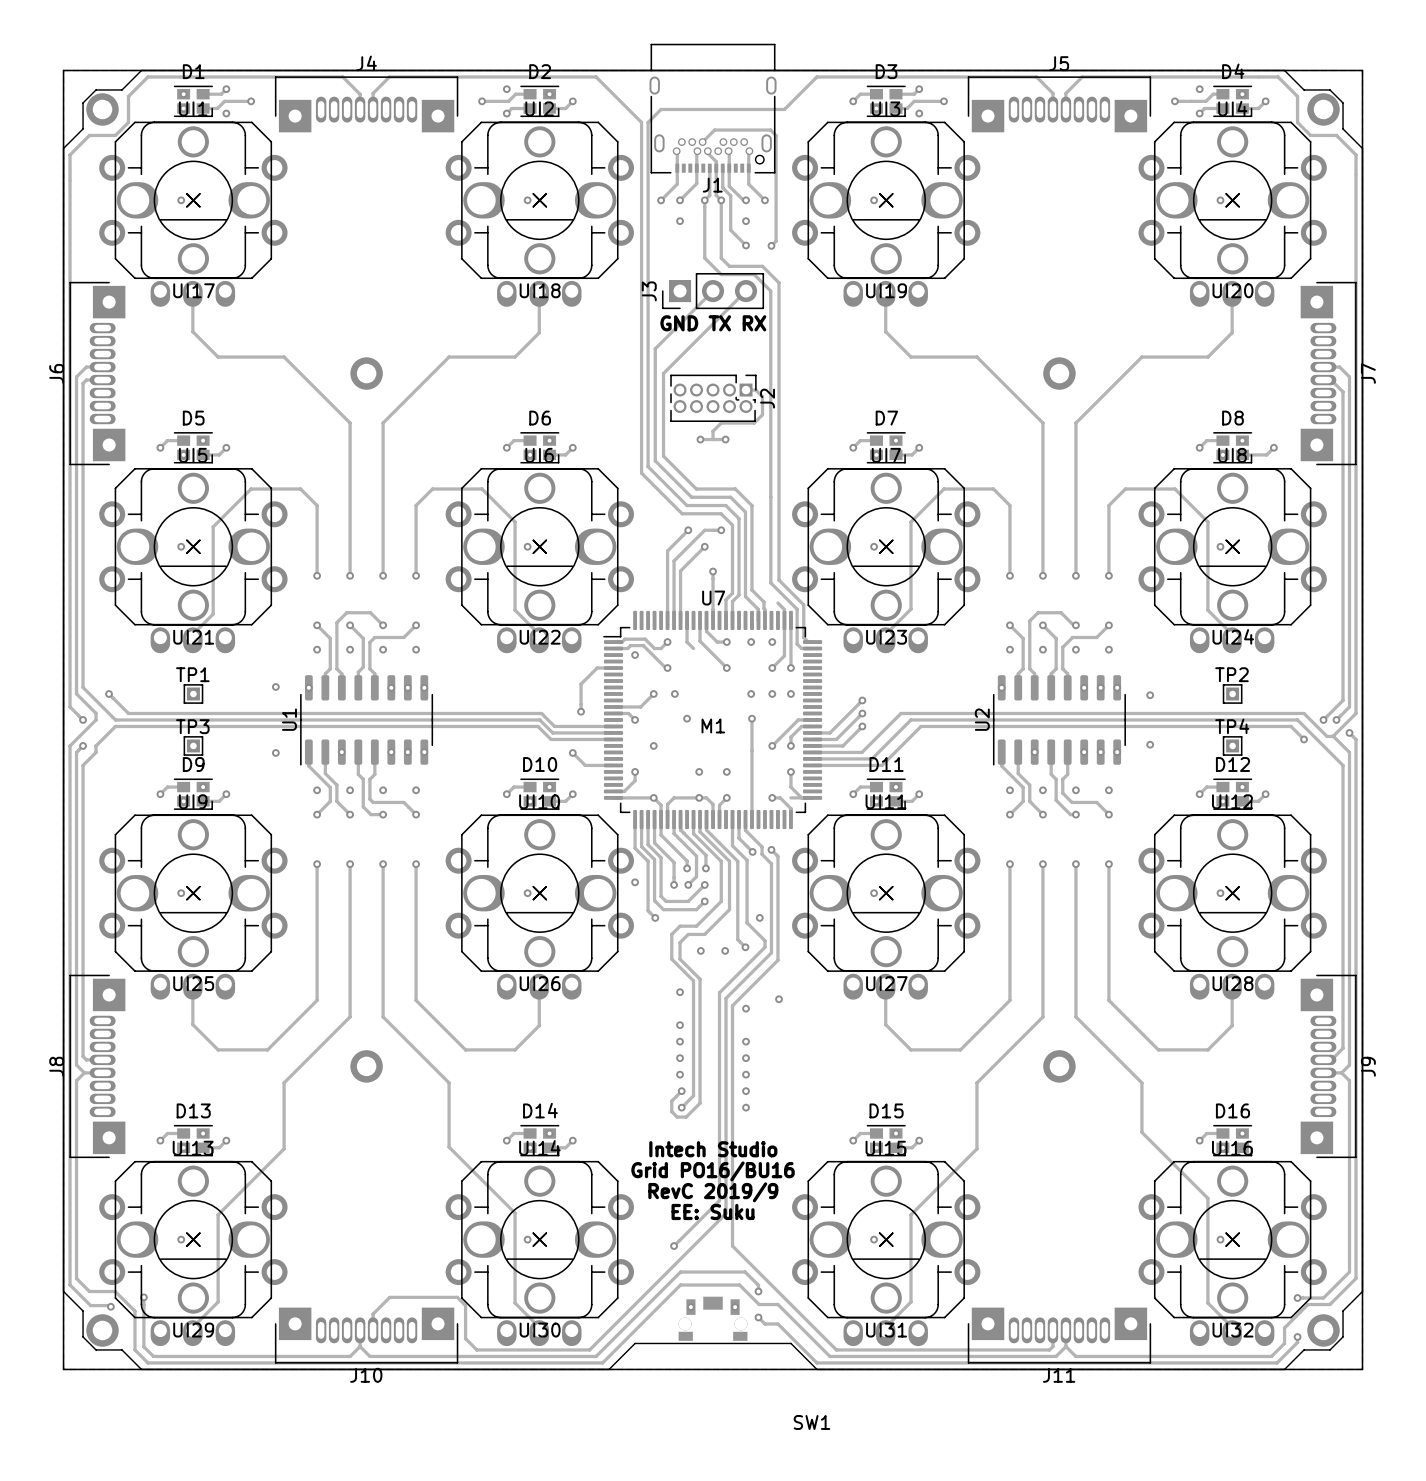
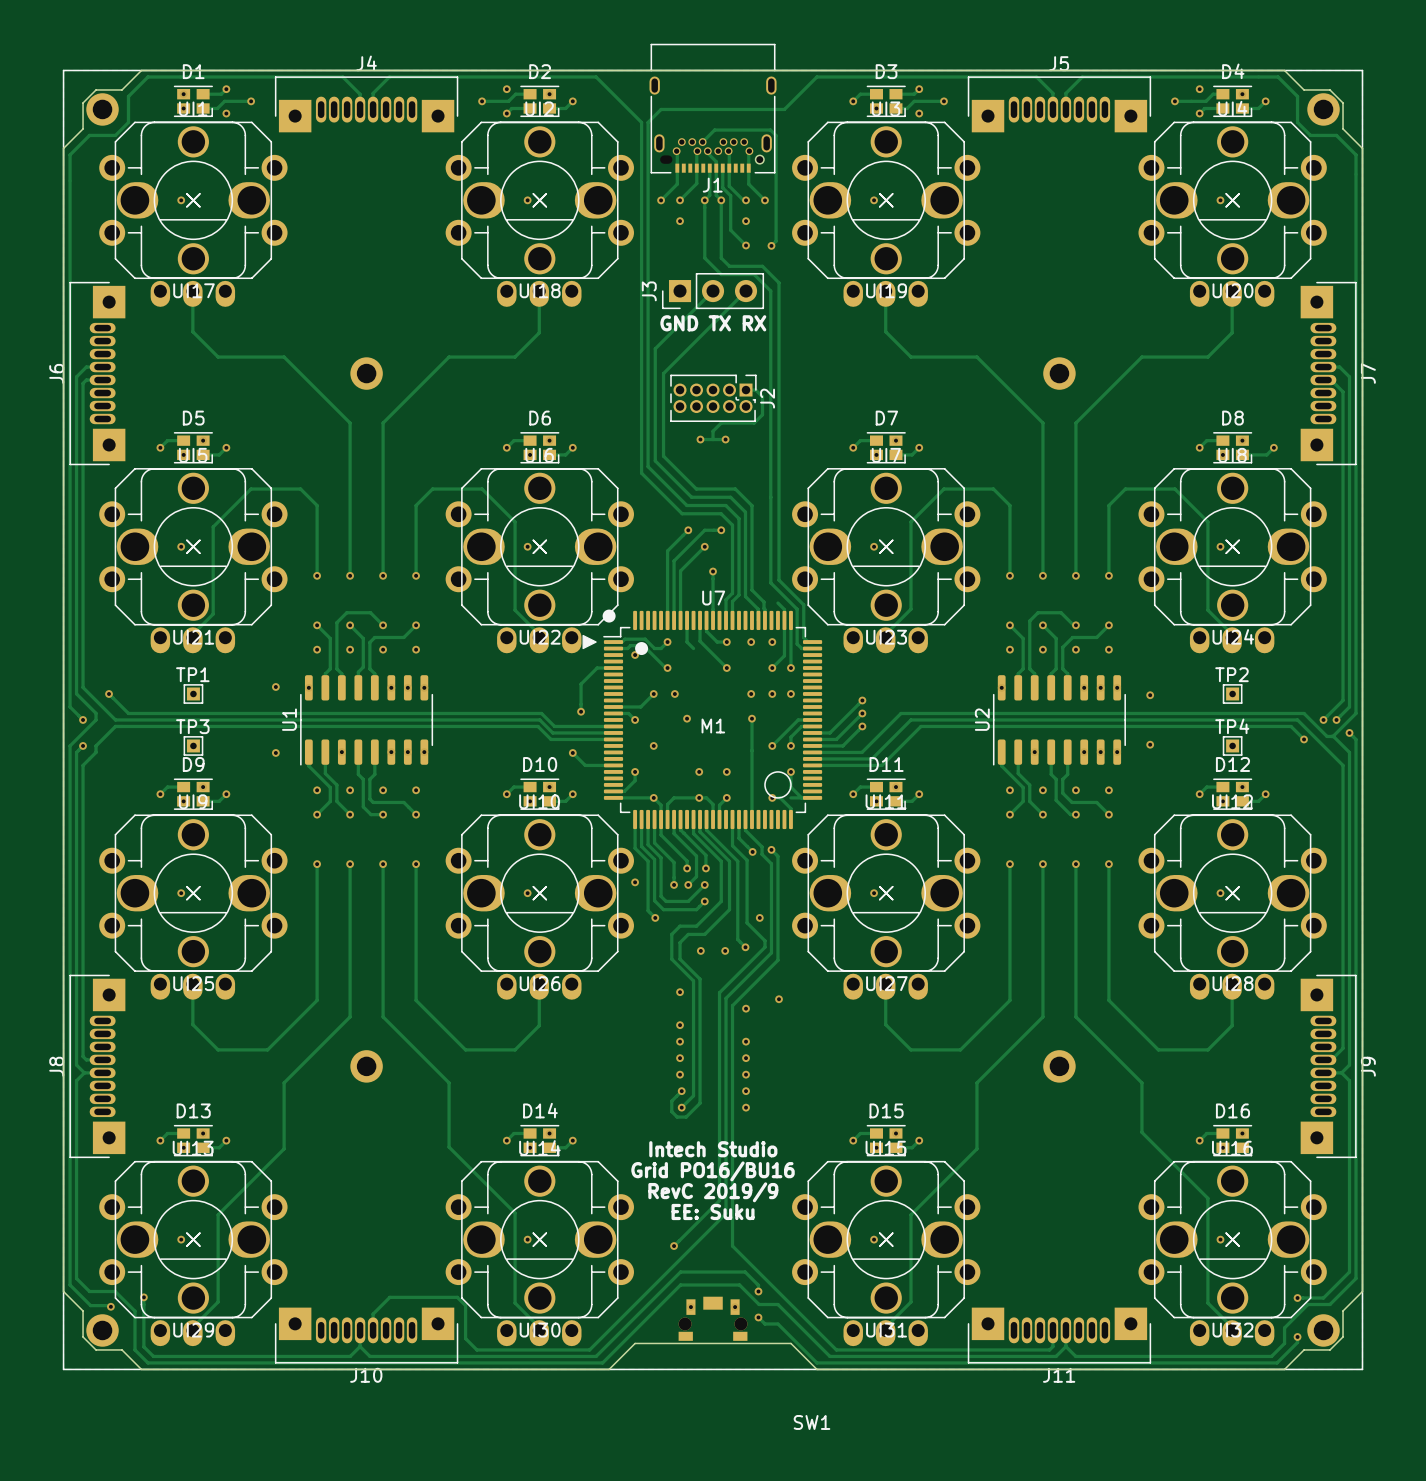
U7 footprint: [603, 610, 823, 830] -> [582, 609, 823, 830]

